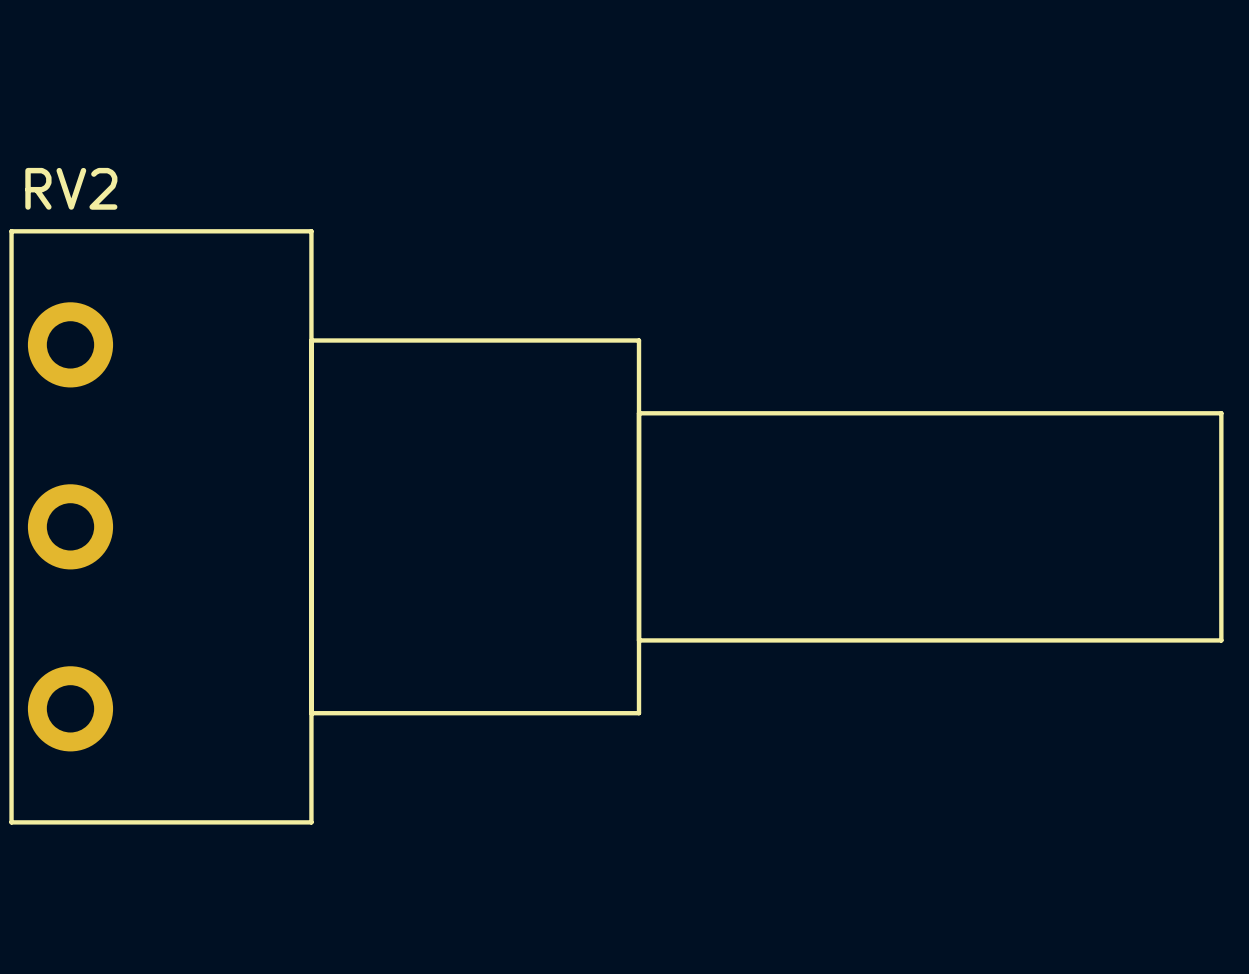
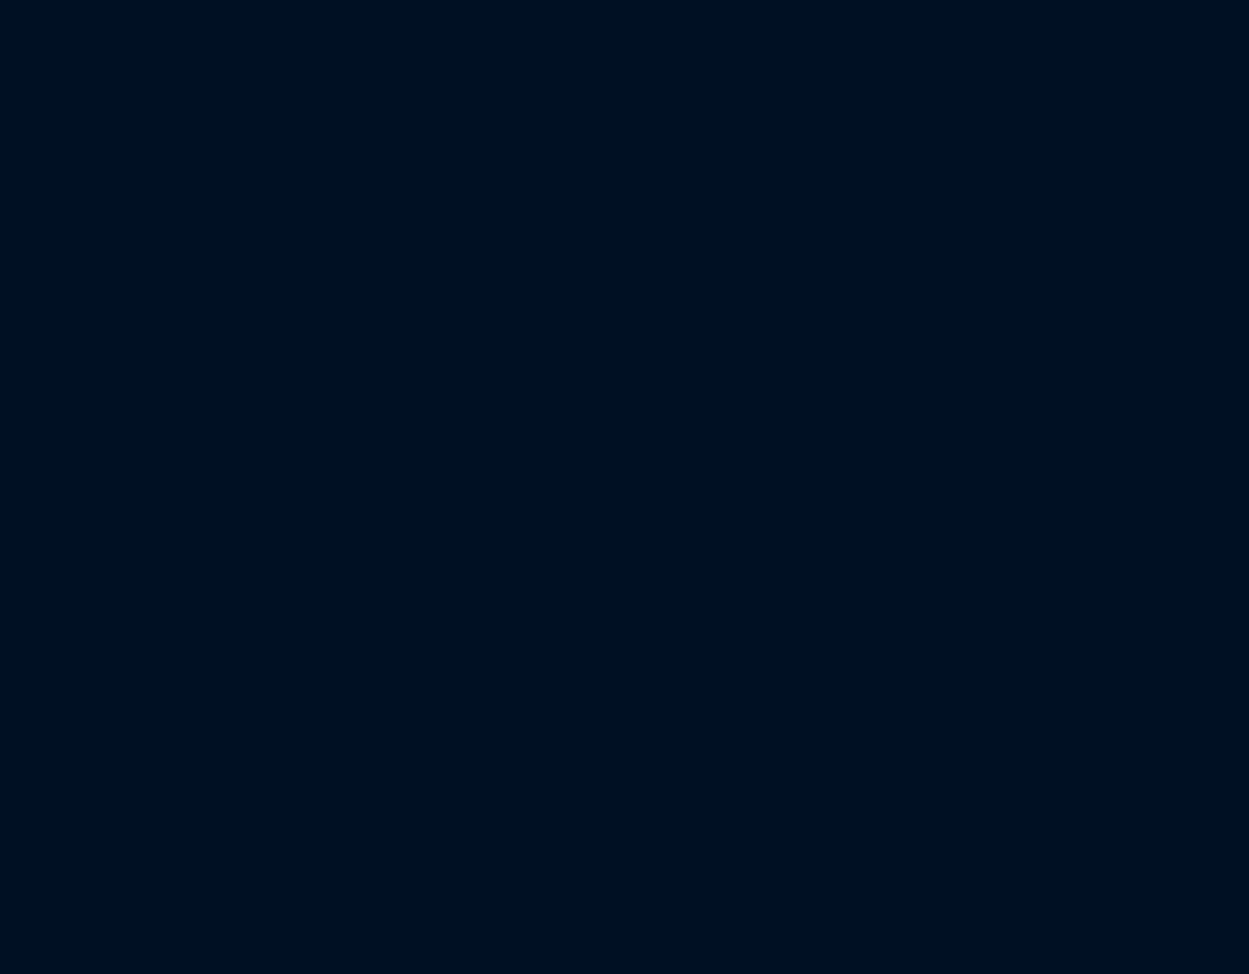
RV2: (616, 526) -> none

